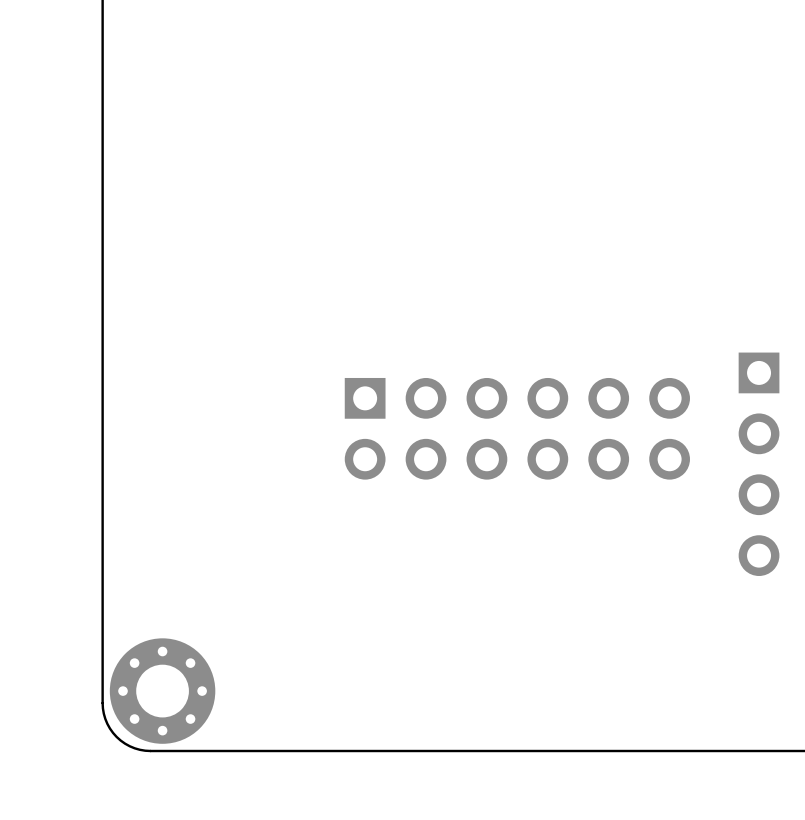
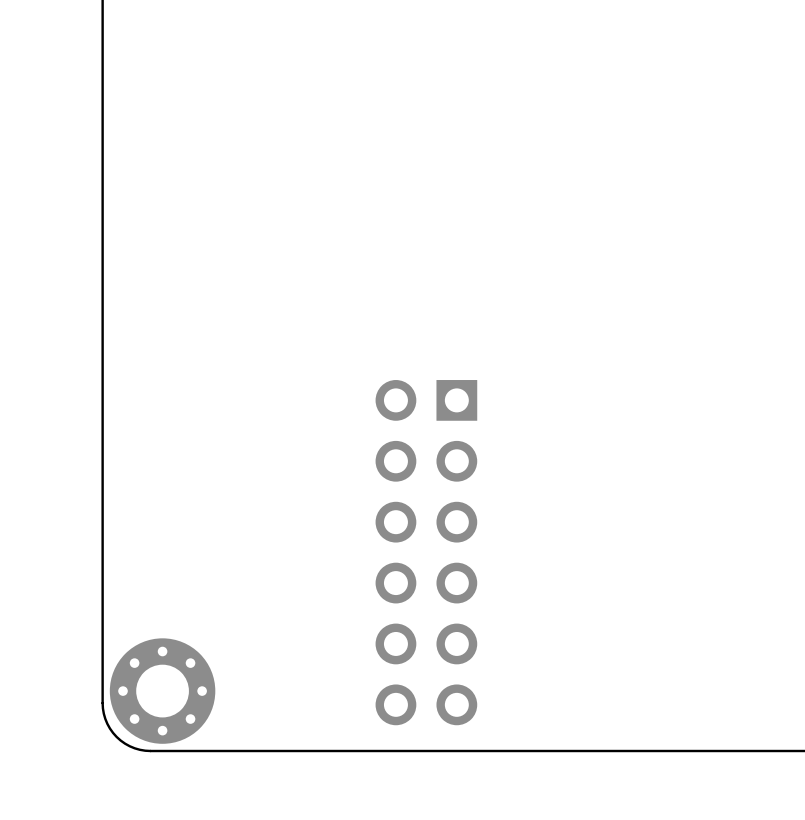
part rotation: 0° (517, 428) -> 90° clockwise (426, 552)
part: (759, 464) -> none

